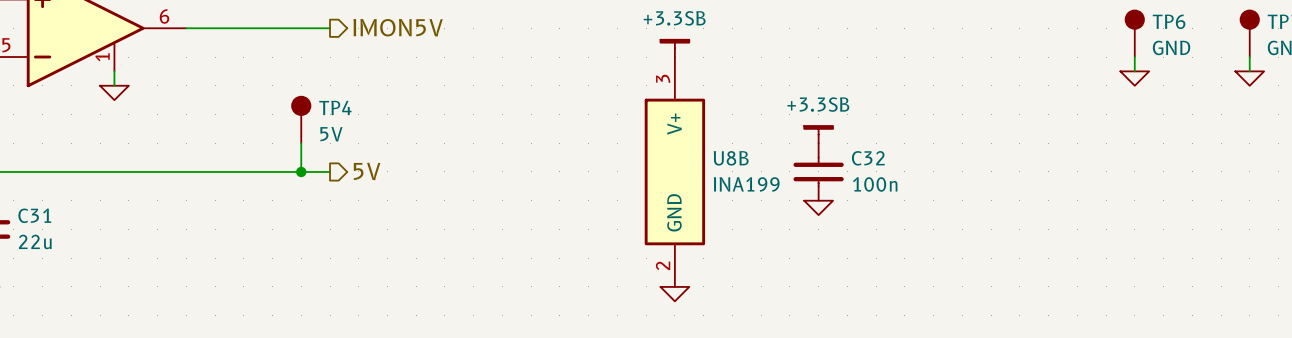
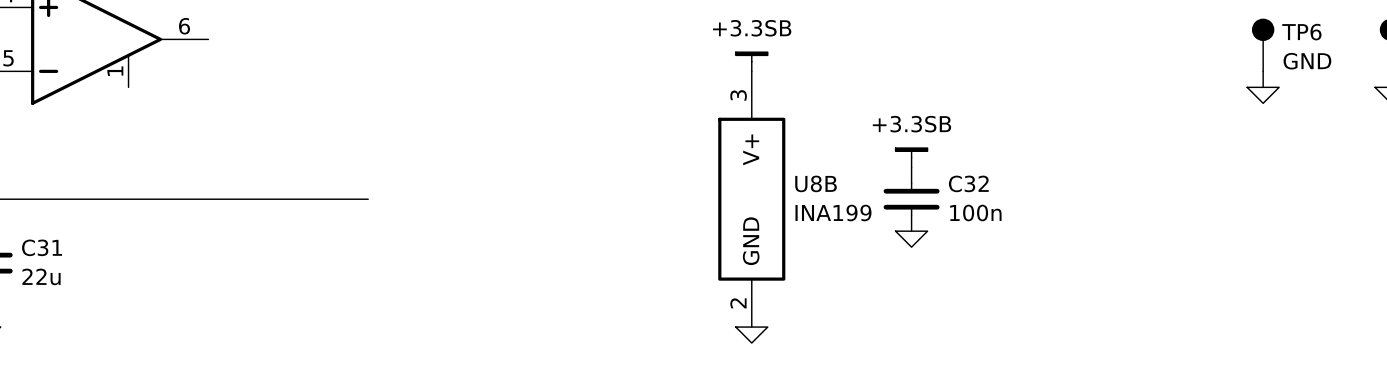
hierarchical label: IMON5V (398, 27) -> none
wire: (186, 28) (330, 28) -> none
wire: (114, 71) (114, 85) -> none
power symbol: (114, 92) -> none
TP4: 5V (301, 119) -> none
wire: (301, 143) (301, 171) -> none
junction: (301, 171) -> none
hierarchical label: 5V (367, 171) -> none

